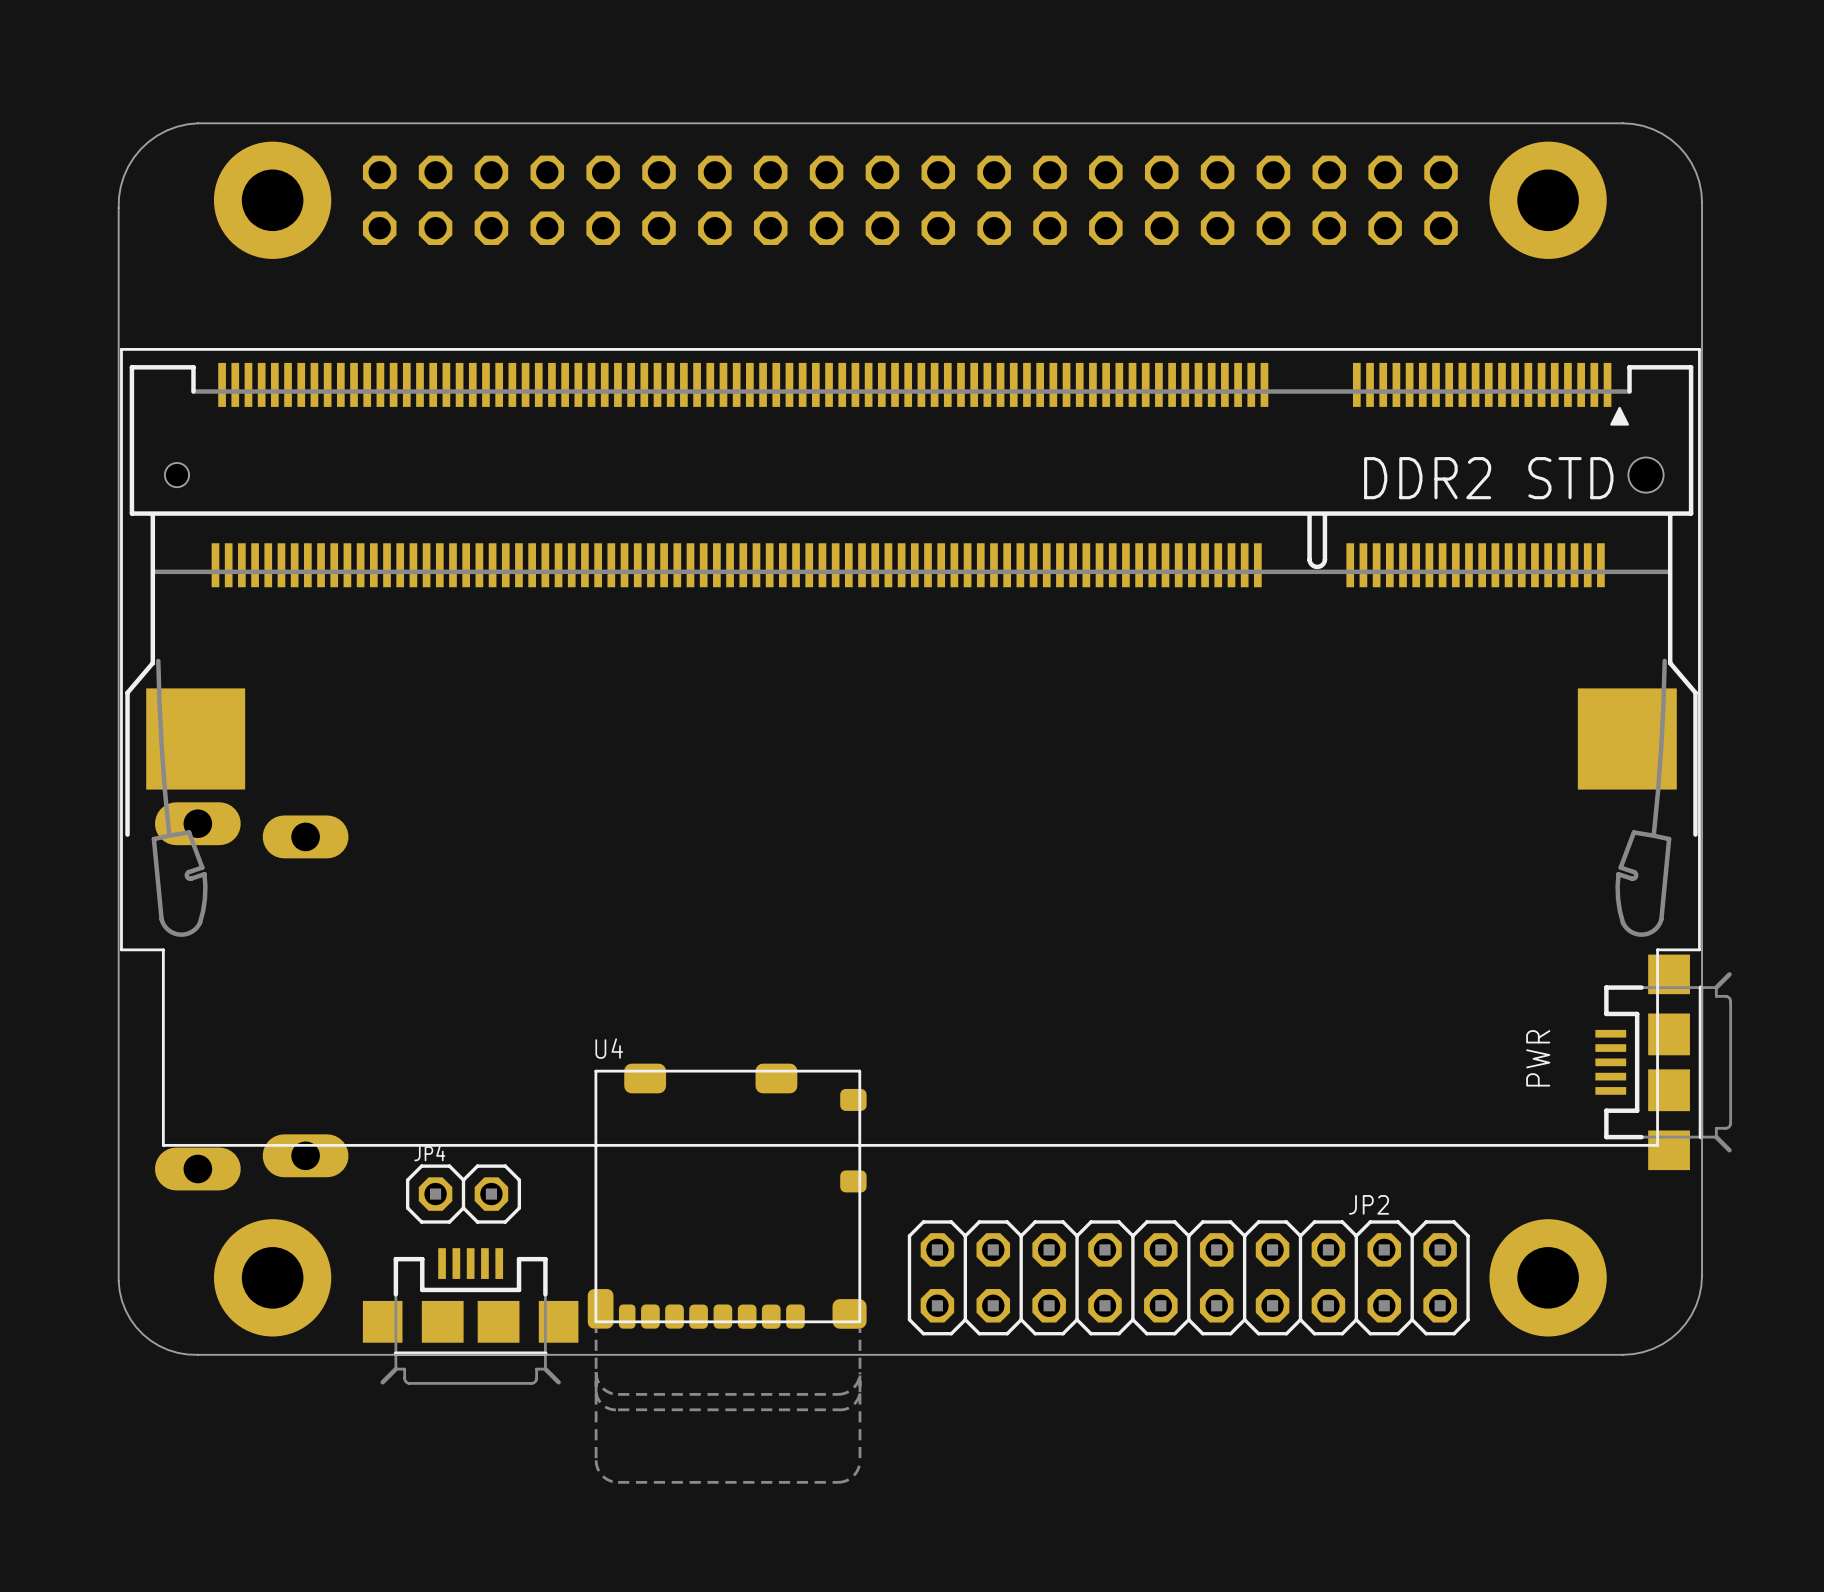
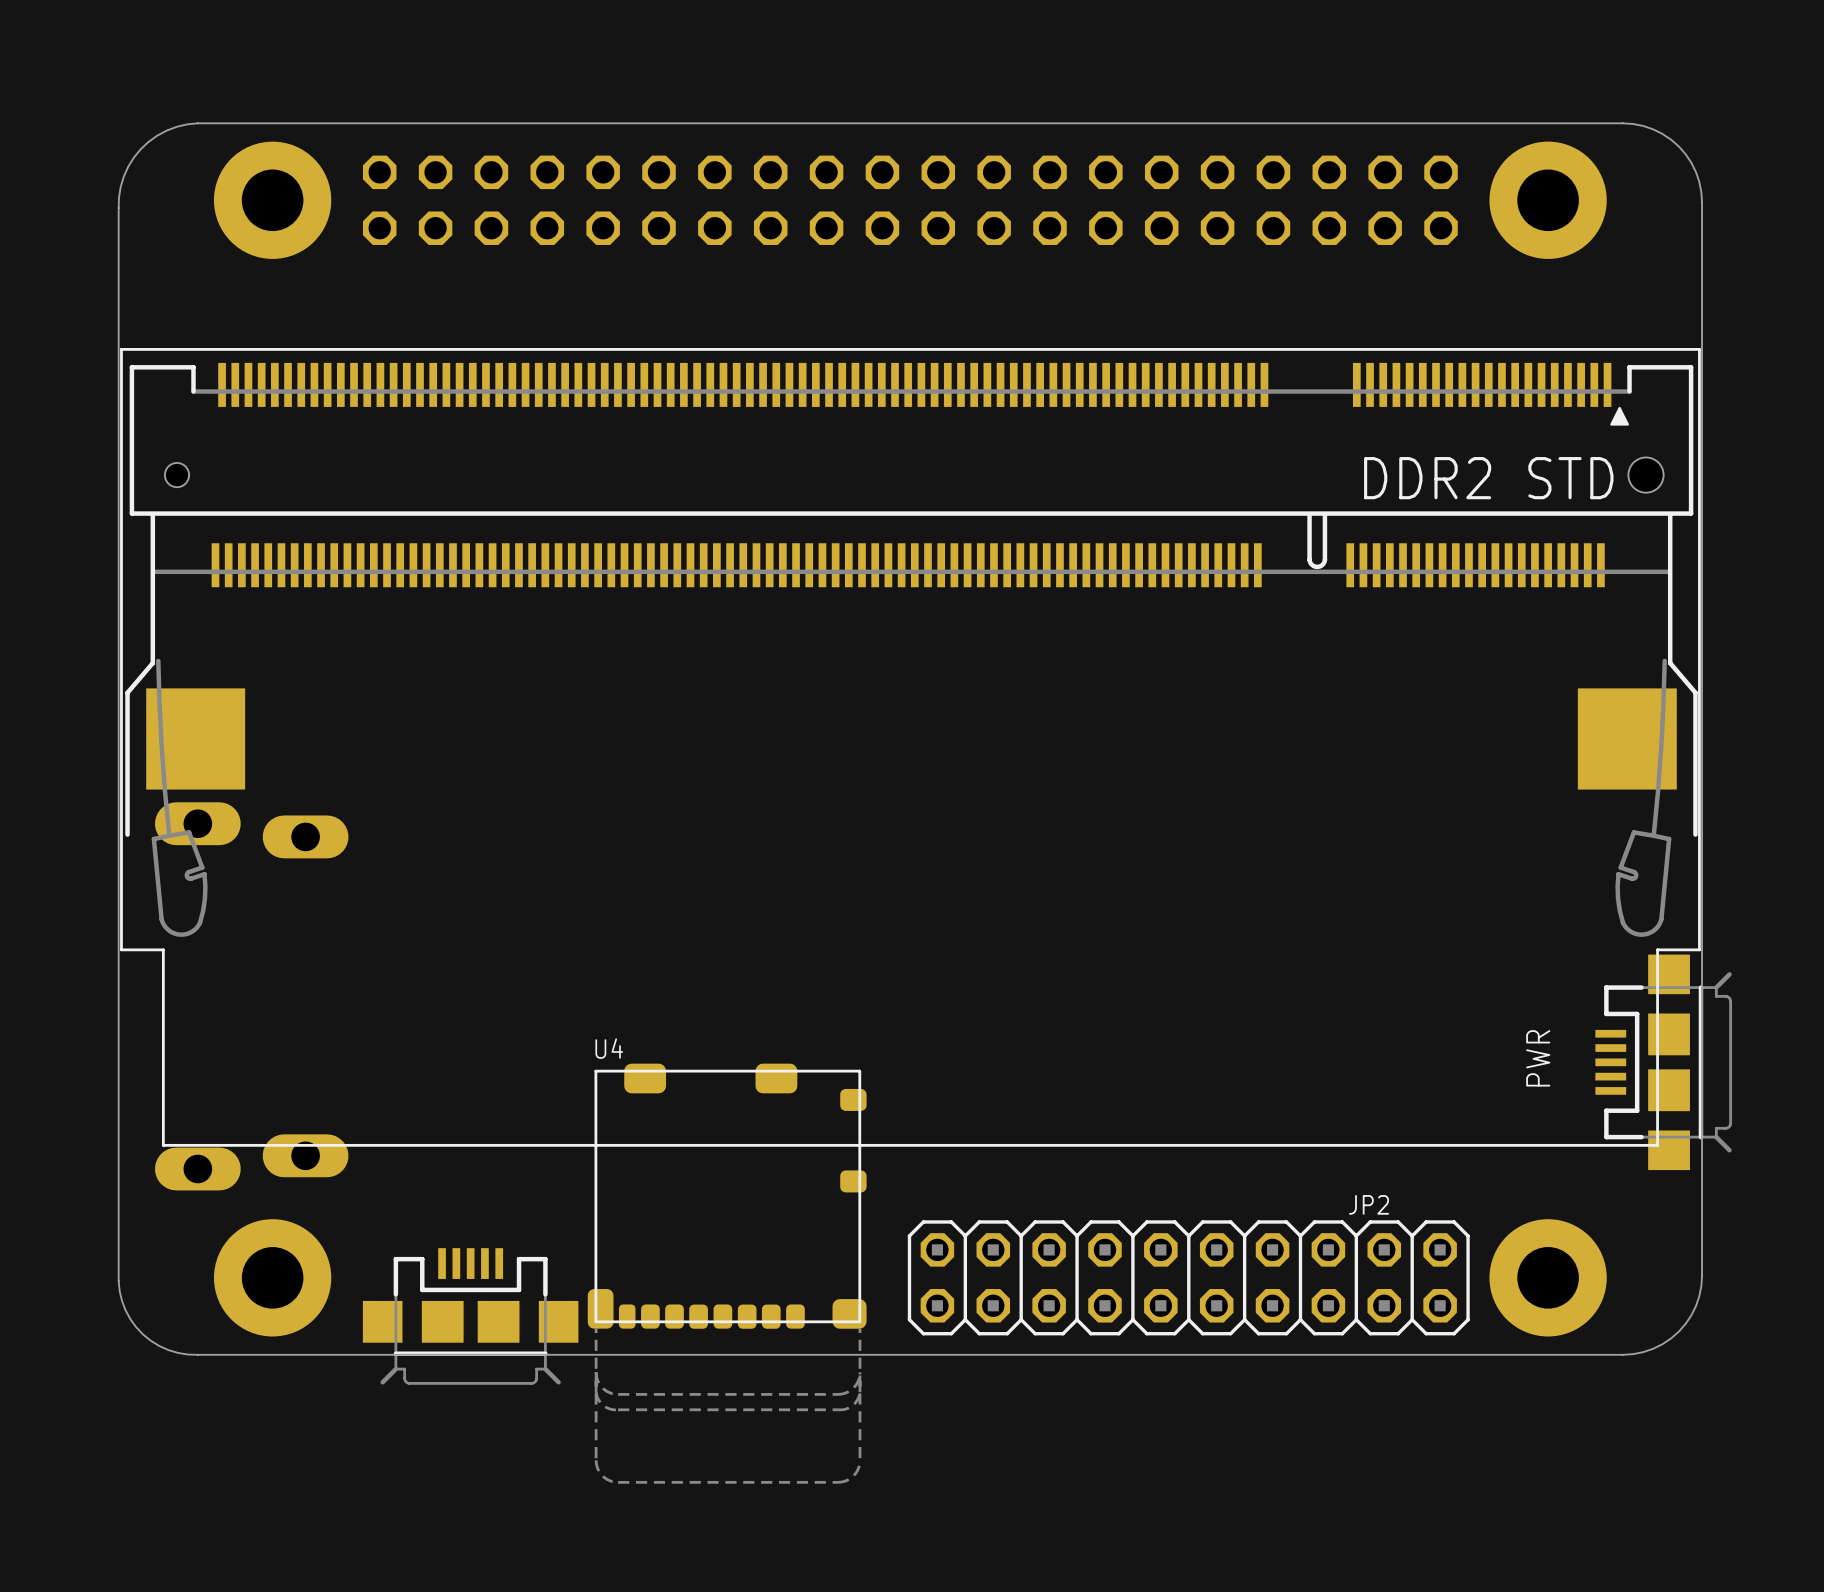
JP4: (463, 1194) -> none

